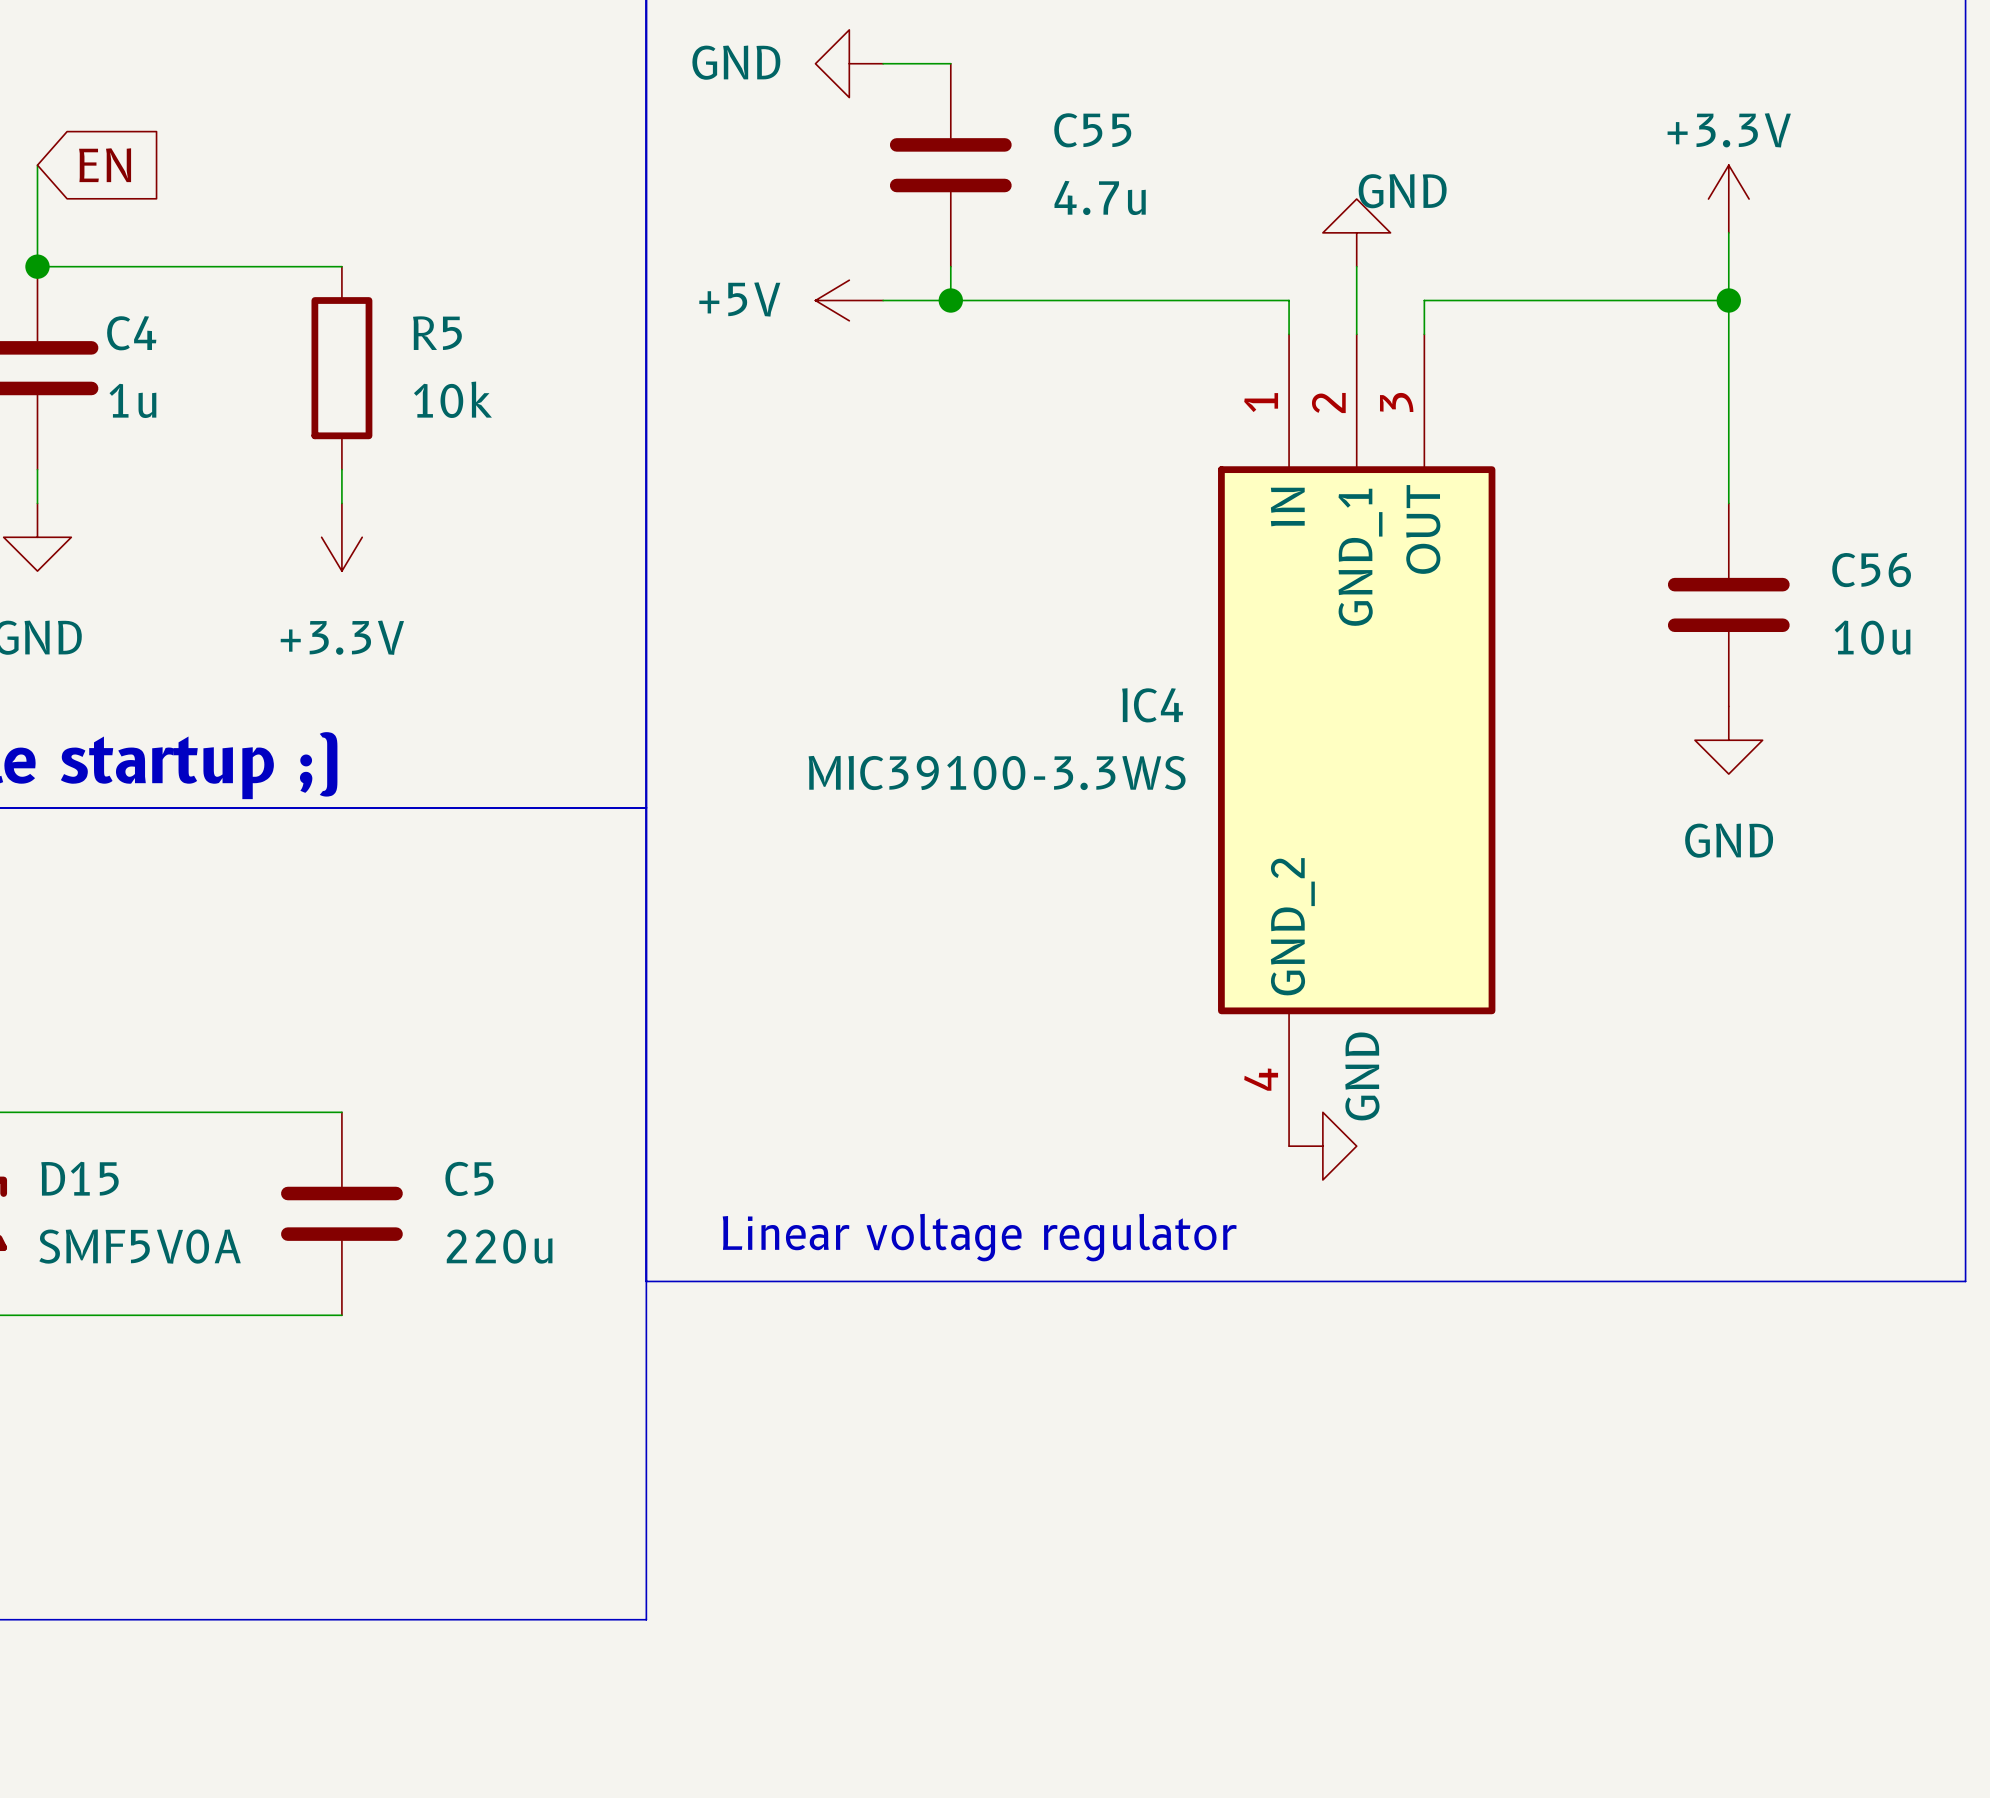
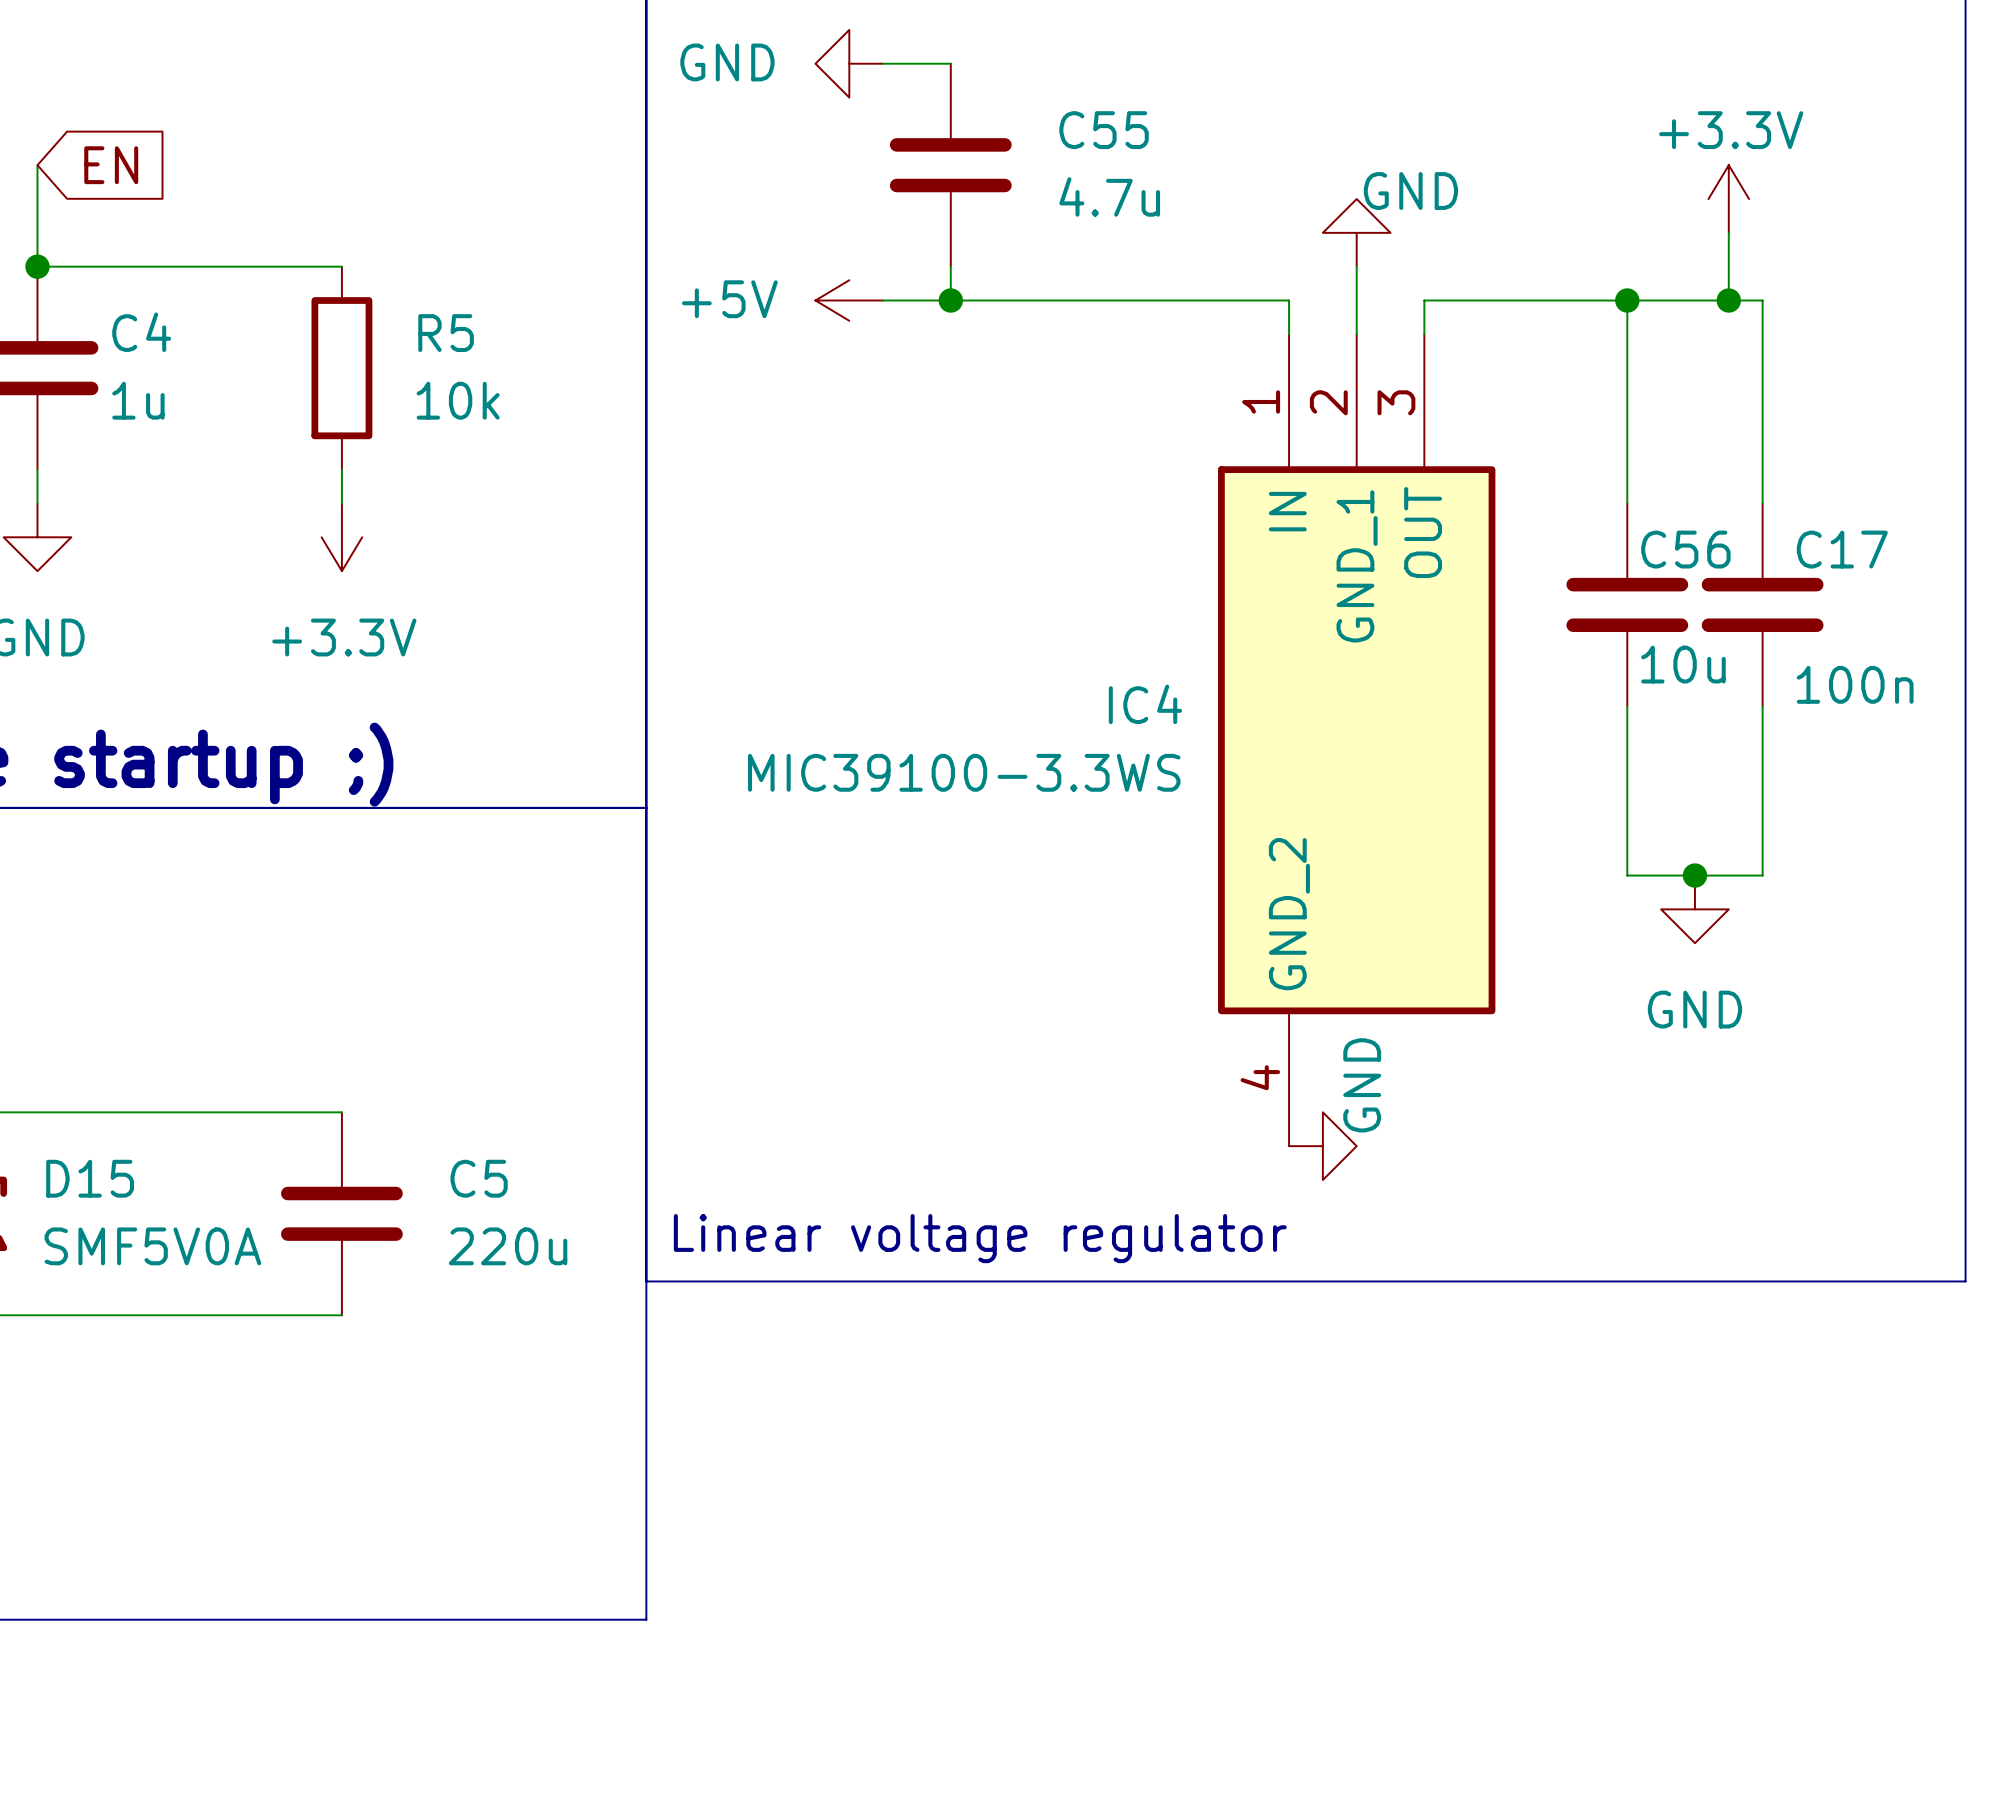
wire: none -> (1627, 300) (1627, 503)
junction: none -> (1627, 300)
wire: (1728, 300) (1728, 503) -> (1728, 300) (1762, 300) (1762, 503)
C56 name position: C56 (1871, 570) -> C56 (1685, 549)
C56 position: (1728, 604) -> (1627, 604)
C17: none -> 100n (1762, 604)
C56 value position: 10u (1872, 637) -> 10u (1683, 664)
wire: none -> (1627, 706) (1627, 875) (1762, 875) (1762, 706)
power symbol position: GND (1728, 740) -> GND (1694, 909)
junction: none -> (1694, 875)

